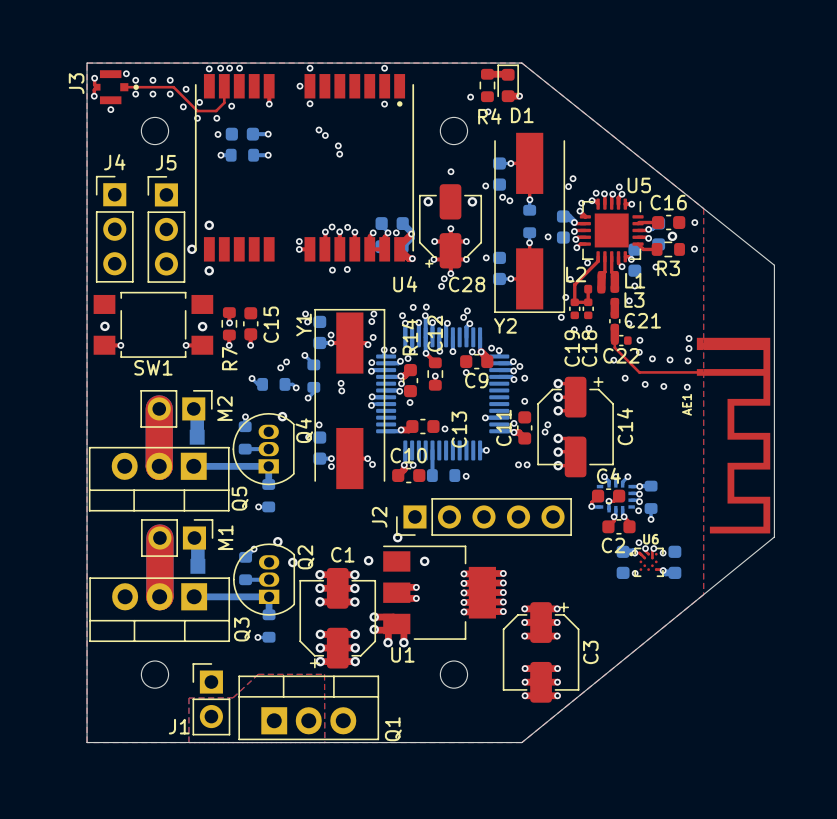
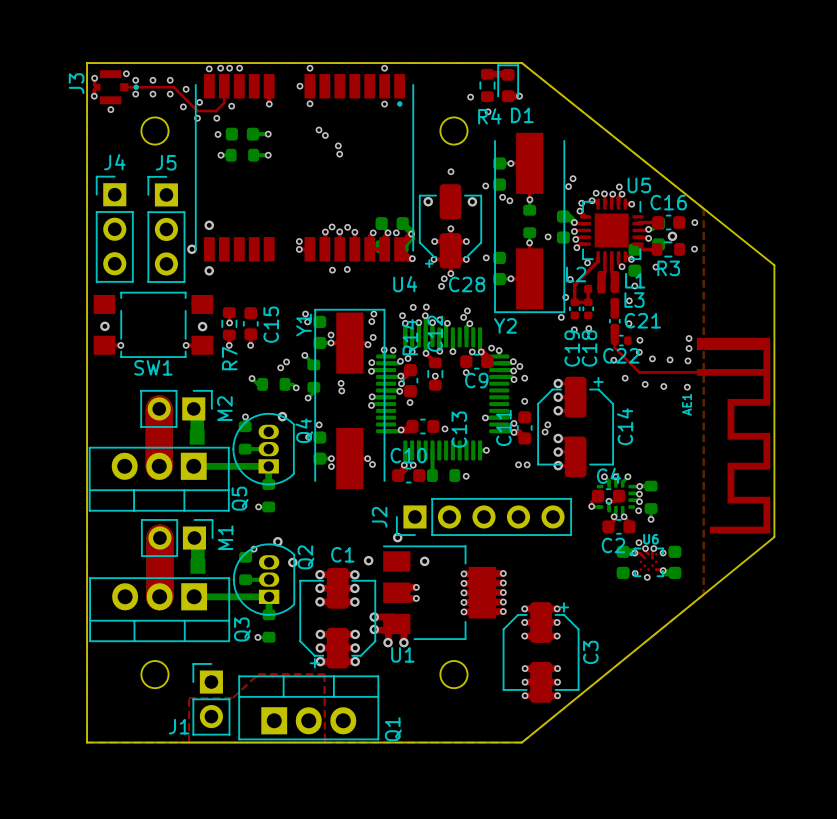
via: none -> (647, 577)

